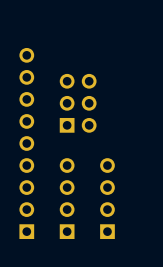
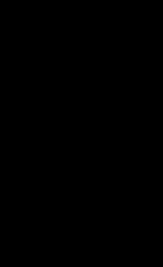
part: (78, 103) -> none
part: (26, 143) -> none
part: (67, 198) -> none
part: (107, 198) -> none

